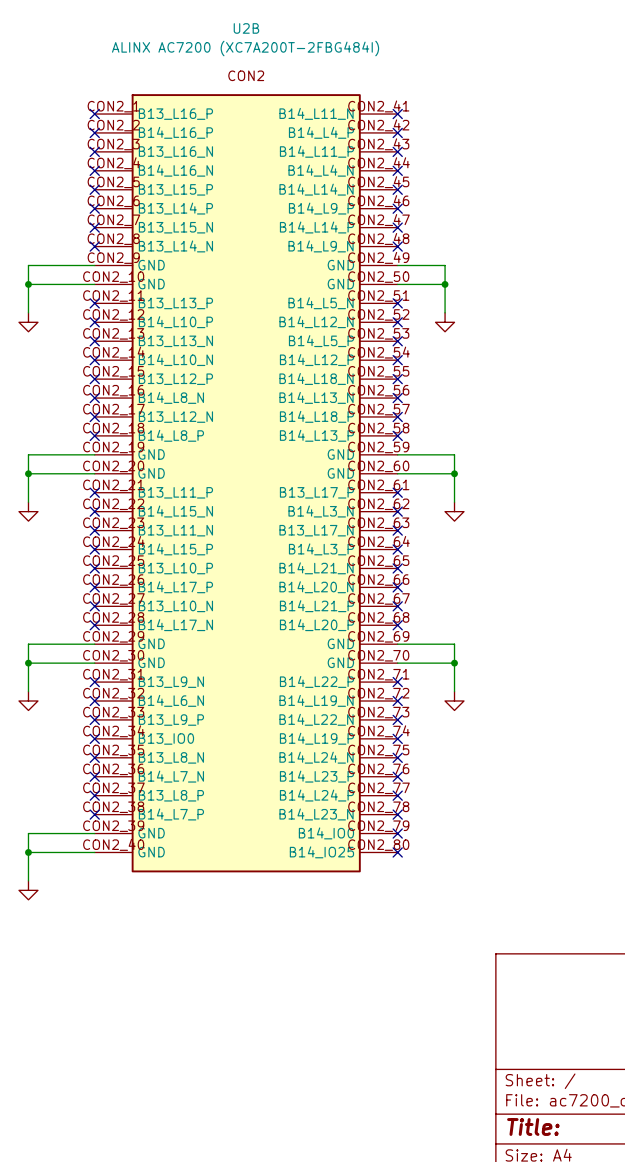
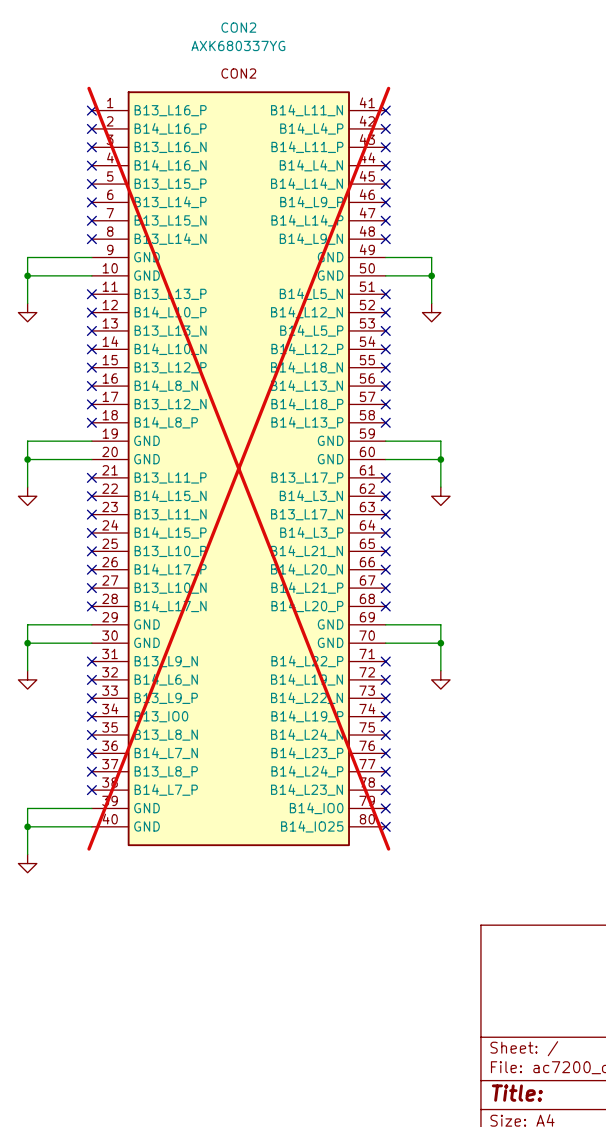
U2B name: U2B (246, 28) -> CON2 (238, 27)
U2B value: ALINX AC7200 (XC7A200T-2FBG484I) (245, 48) -> AXK680337YG (238, 45)
U2B symbol: [94, 94, 398, 873] -> [91, 91, 386, 847]
U2B do-not-place cross: none -> (238, 468)

